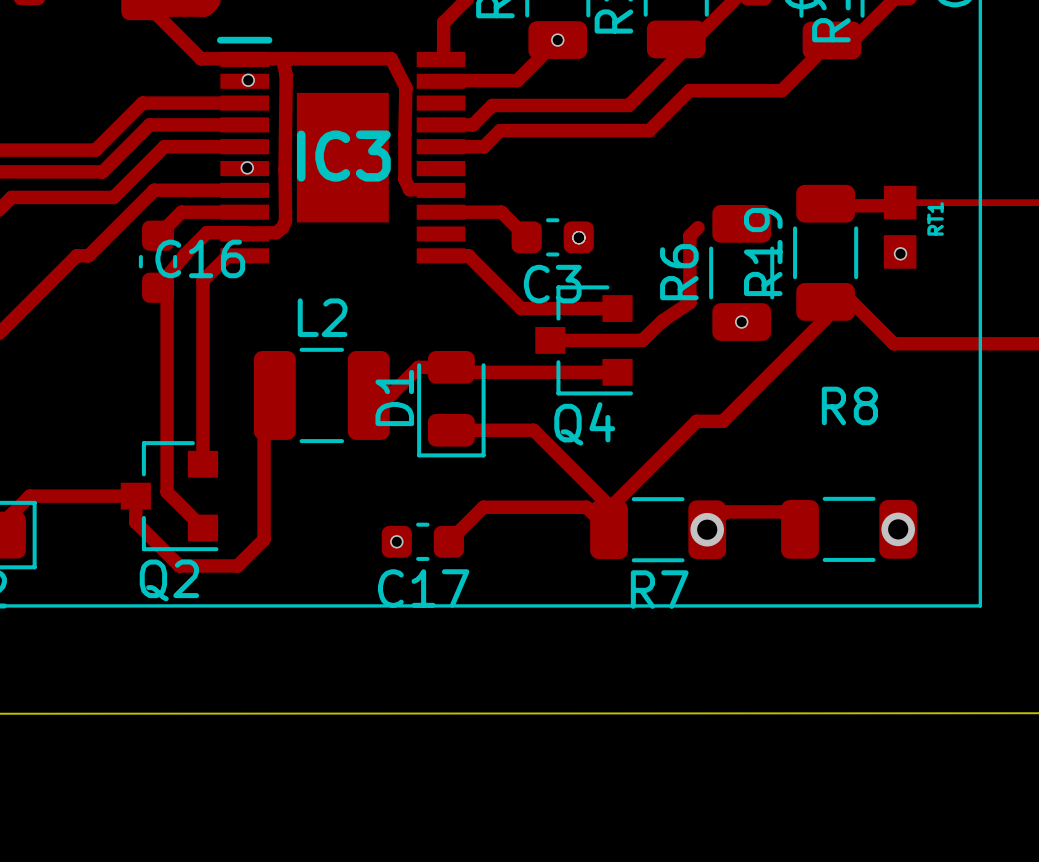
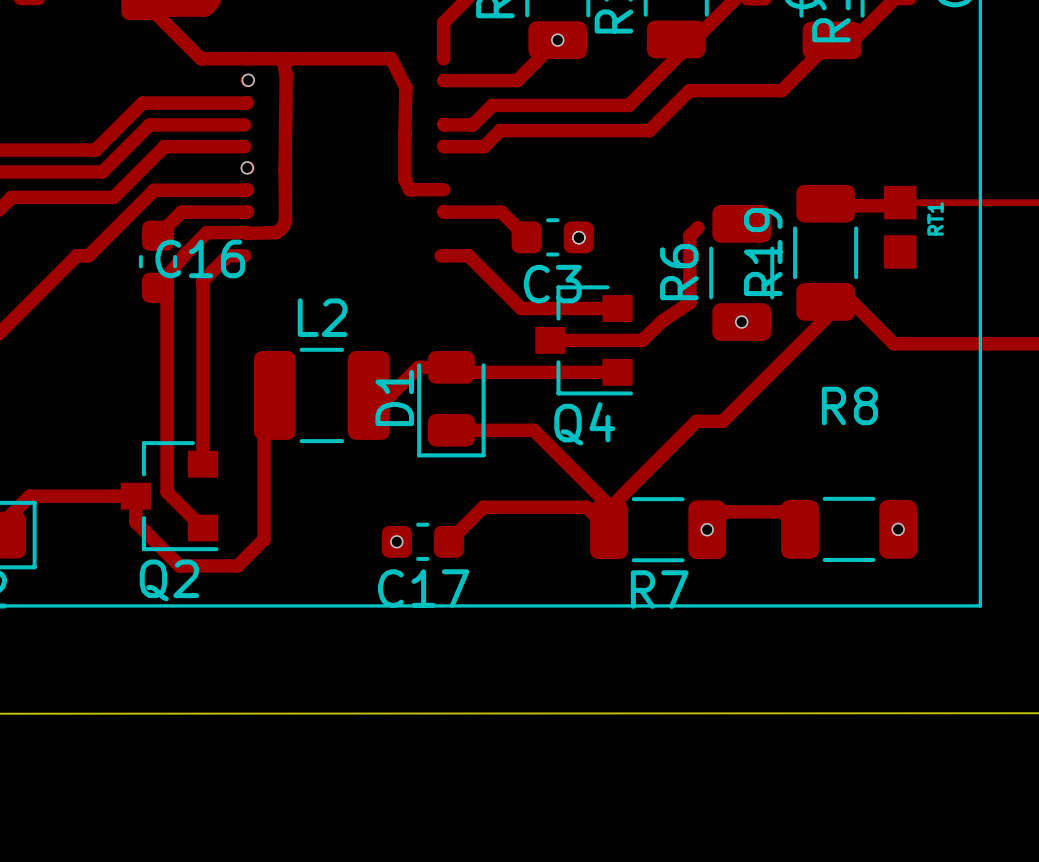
IC3: (341, 150) -> none
via: (900, 253) -> none
via size: [690, 512, 724, 547] -> [700, 523, 714, 537]
via size: [881, 512, 915, 547] -> [891, 522, 905, 537]

